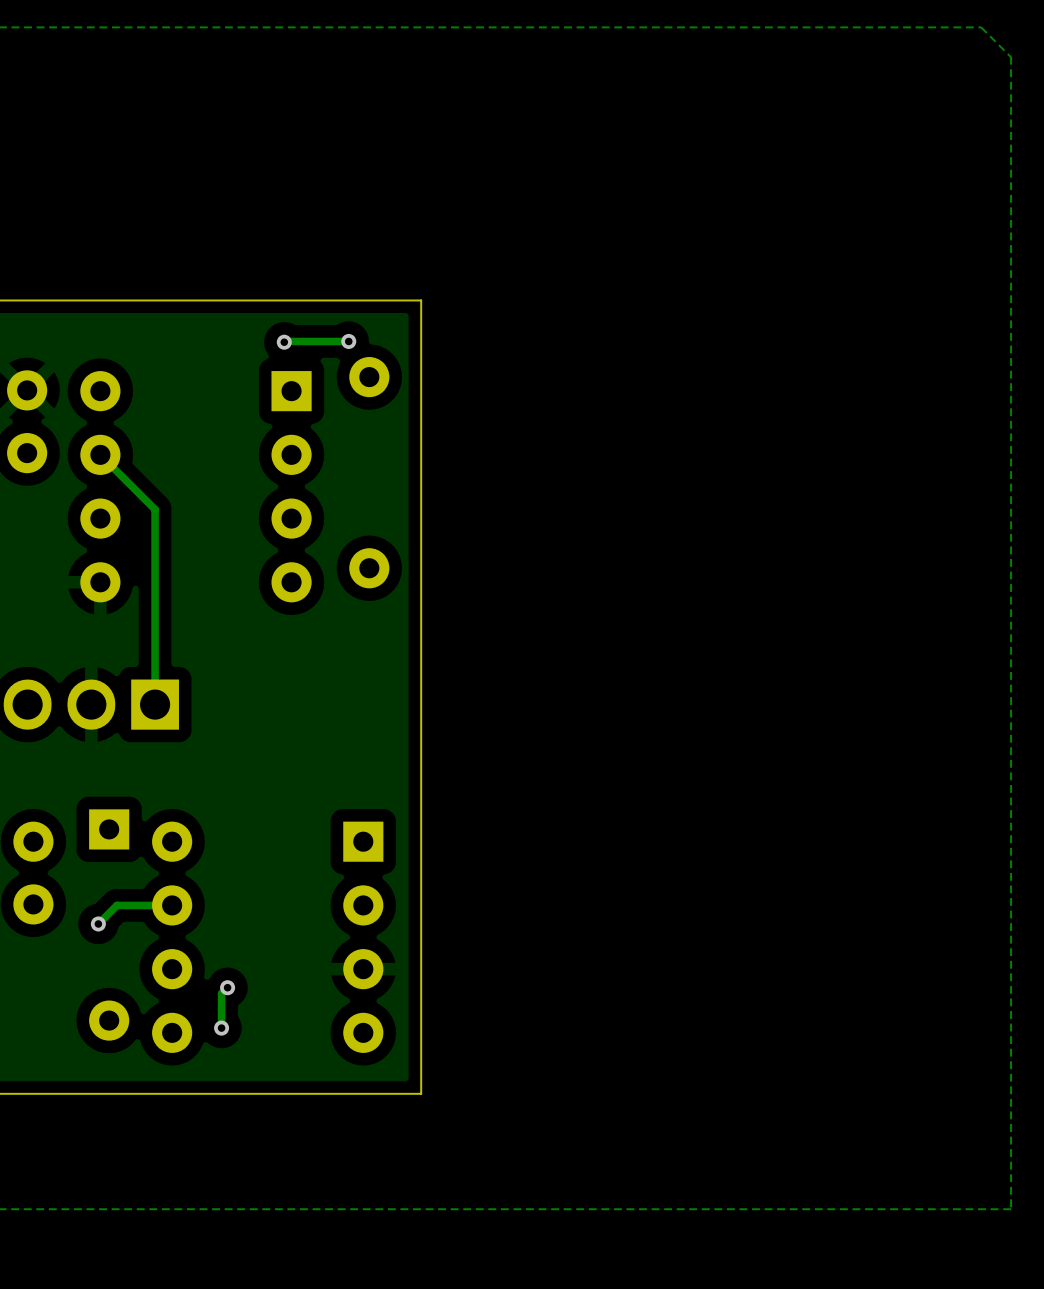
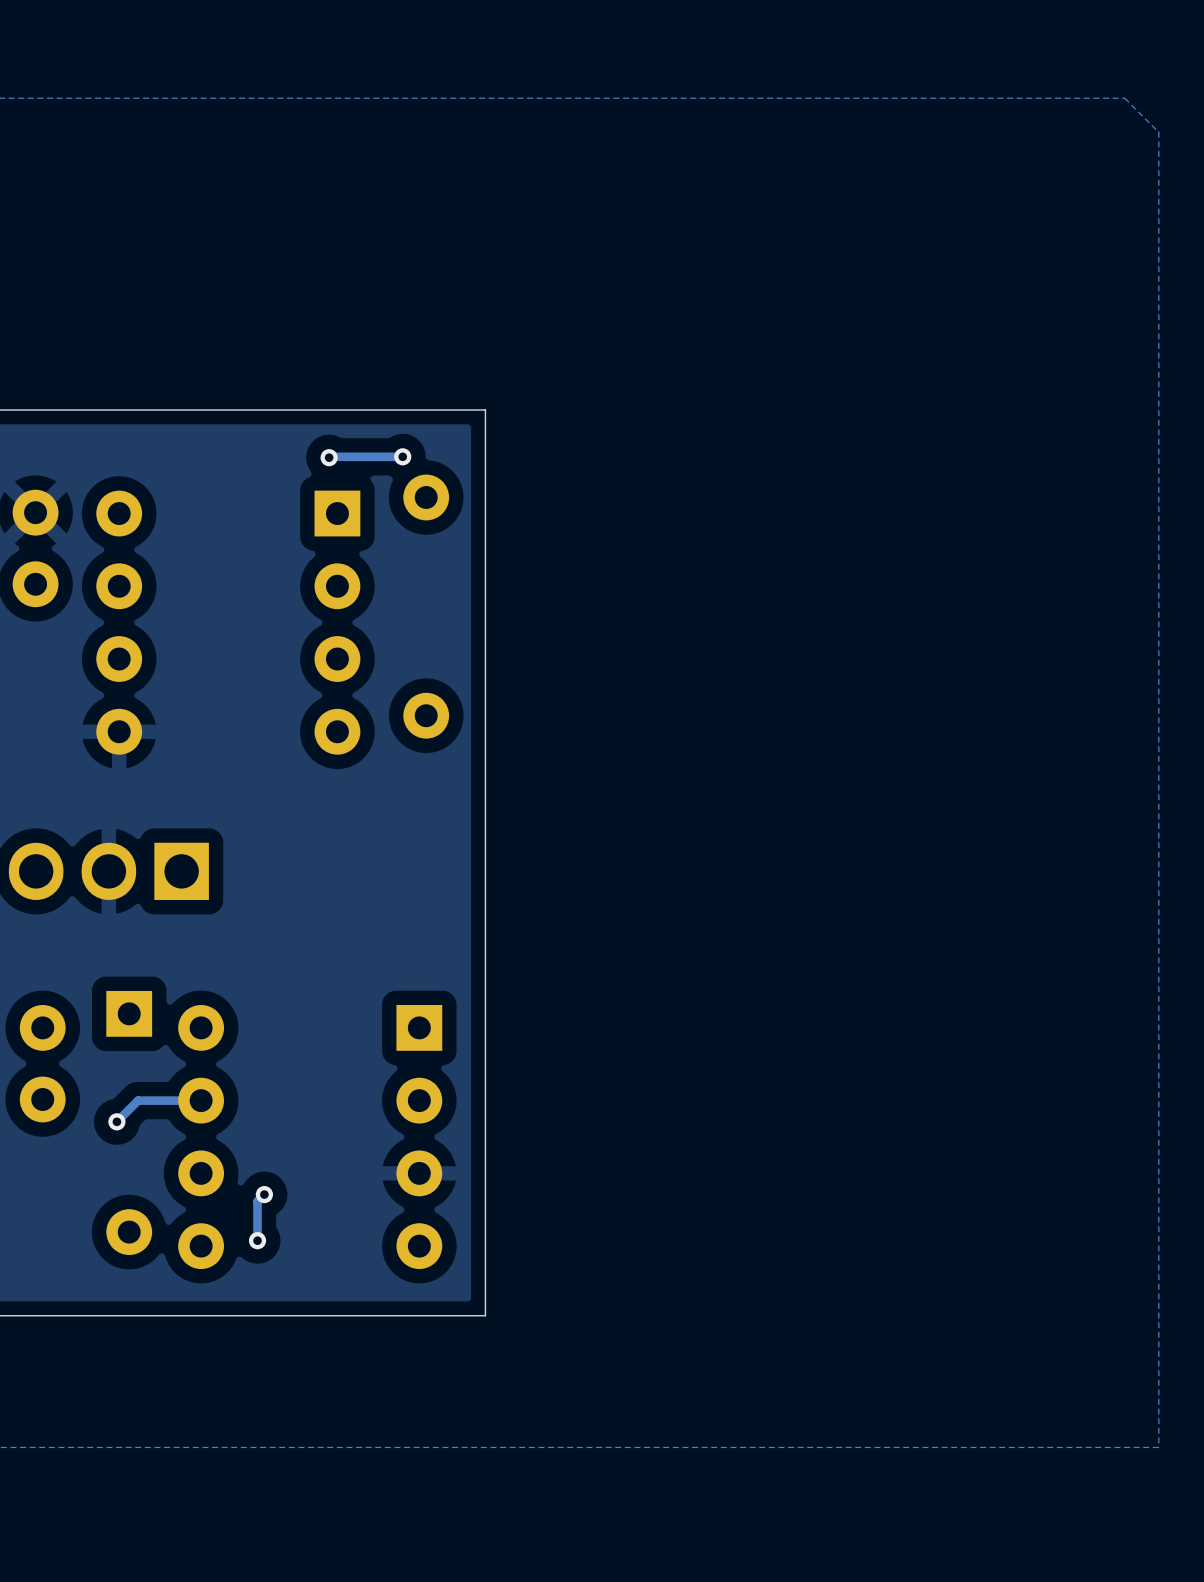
track: (100, 454) (155, 509) (155, 704) -> none

